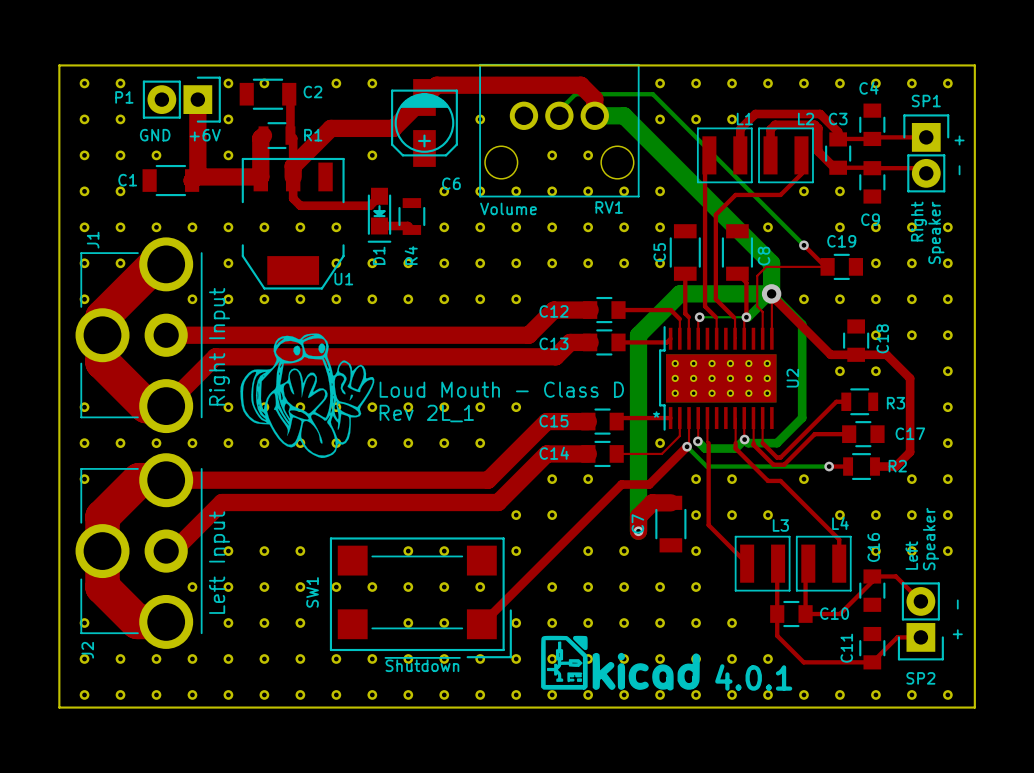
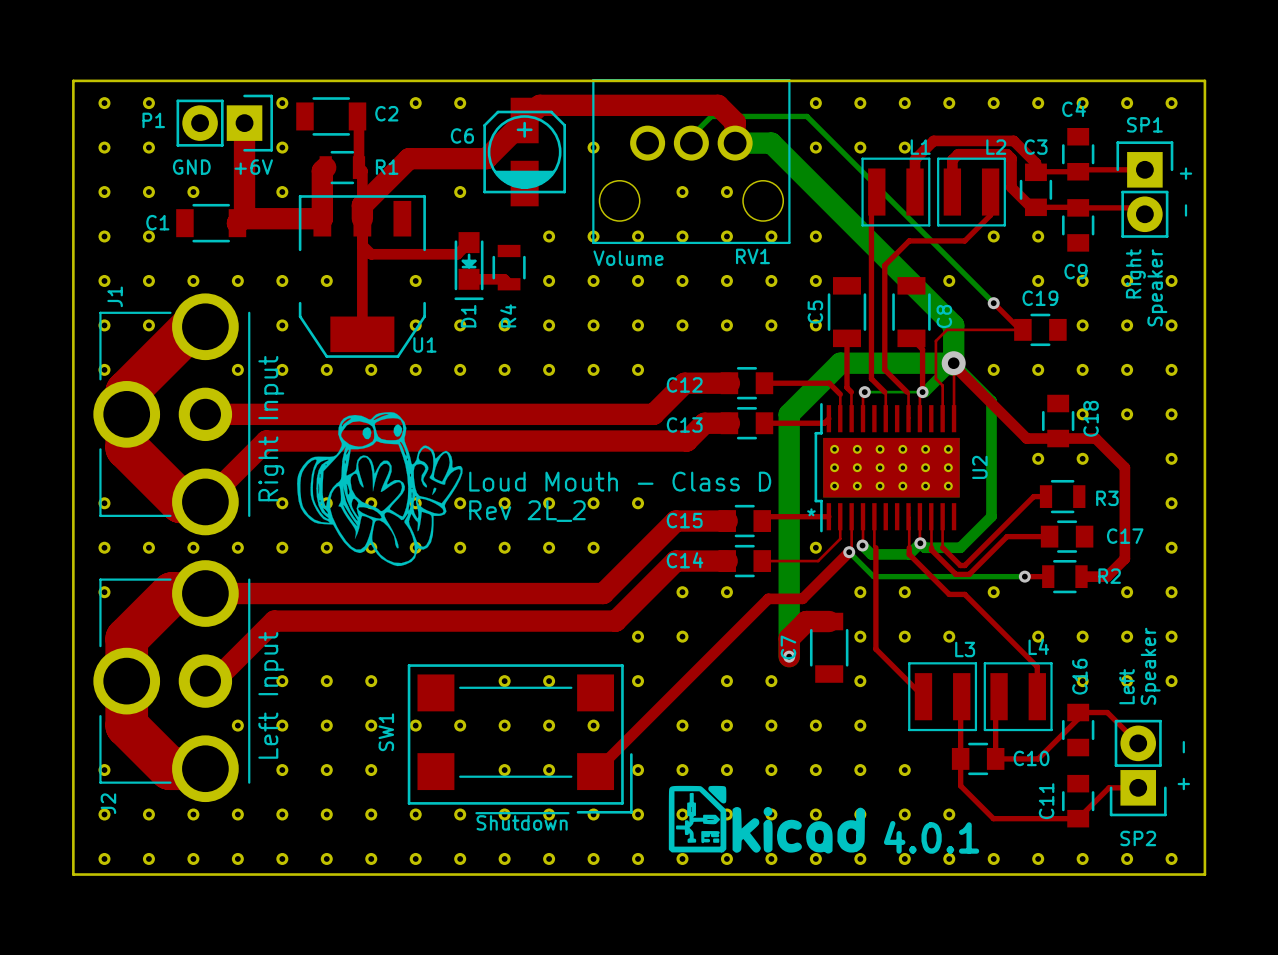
part: (264, 83) -> none
C6 rotation: 0° (424, 122) -> 180° (524, 152)
C6 name position: C6 (451, 183) -> C6 (462, 135)
top track: none -> (362, 245) (362, 334)
part: (300, 227) -> none
text: Rev 2L_1 (426, 413) -> Rev 2L_2 (527, 511)

